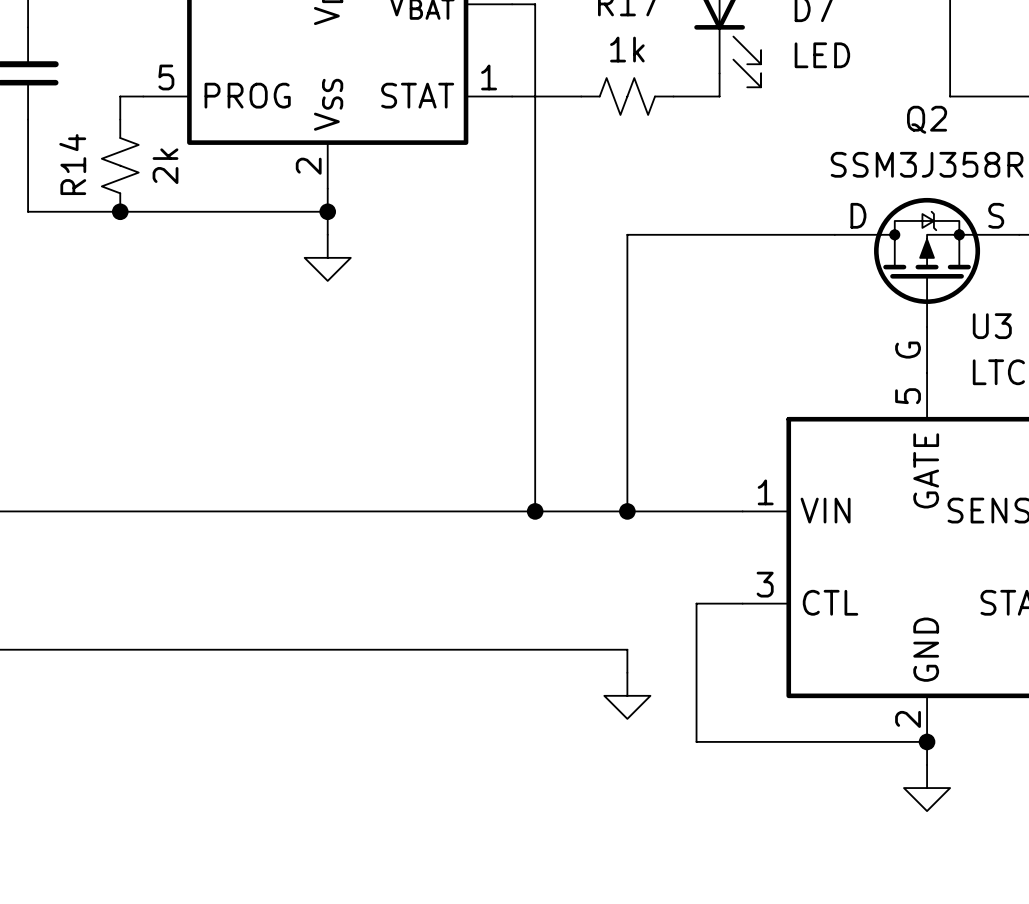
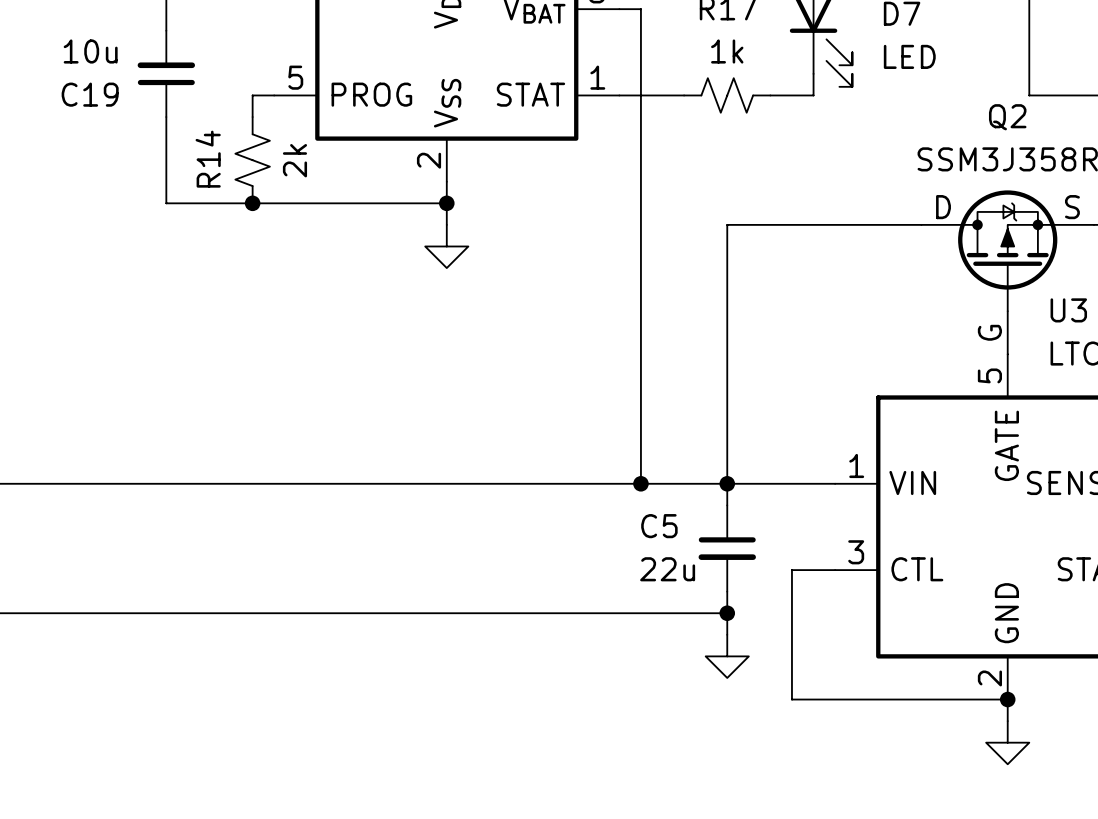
wire: none -> (727, 483) (727, 505)
C5: none -> 22u (727, 548)
wire: none -> (727, 591) (727, 613)
junction: none -> (727, 613)

